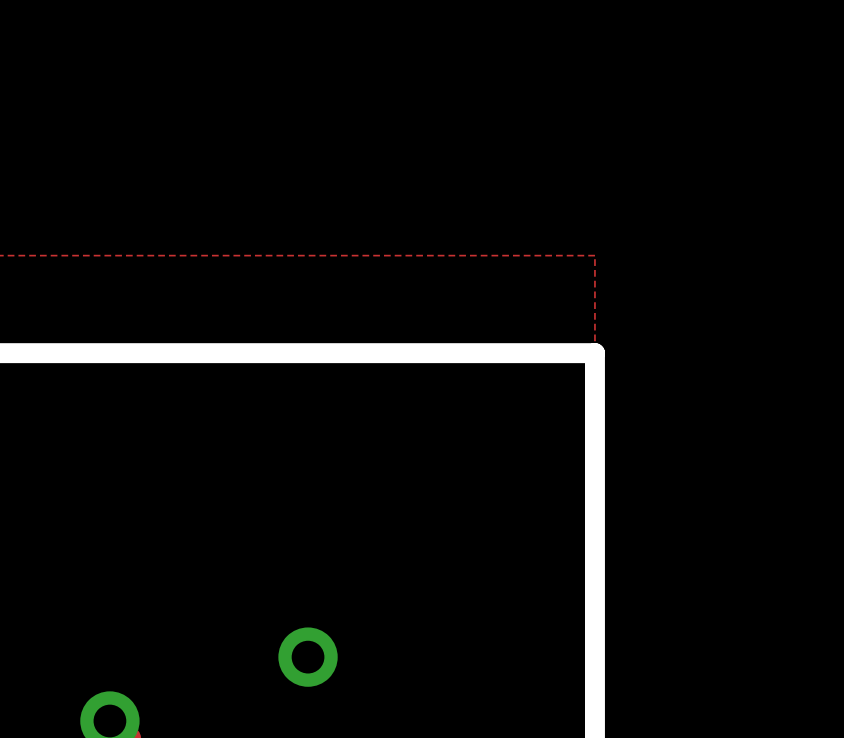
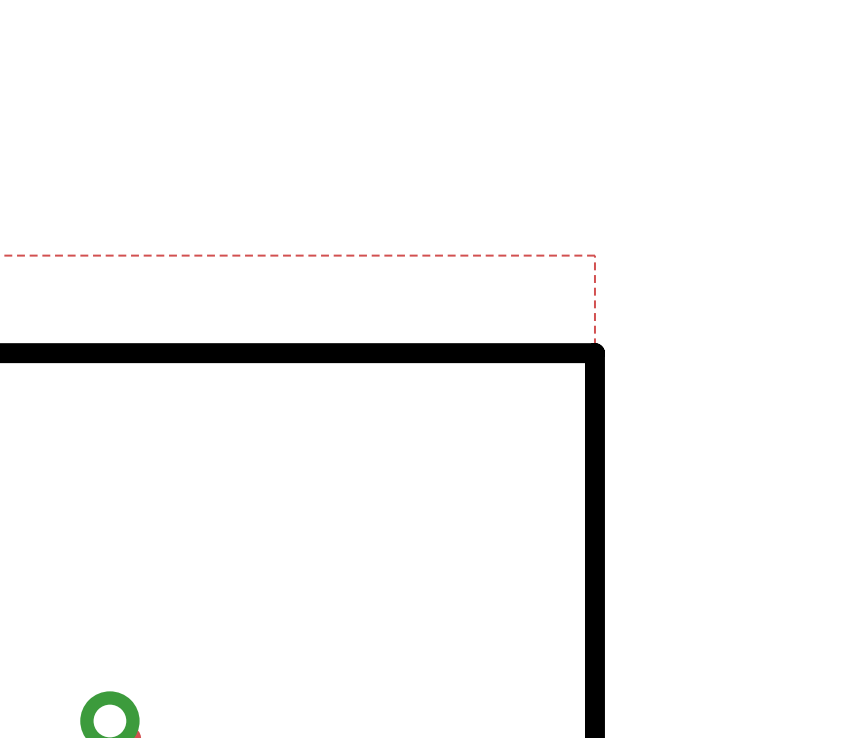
via: (308, 657) -> none

